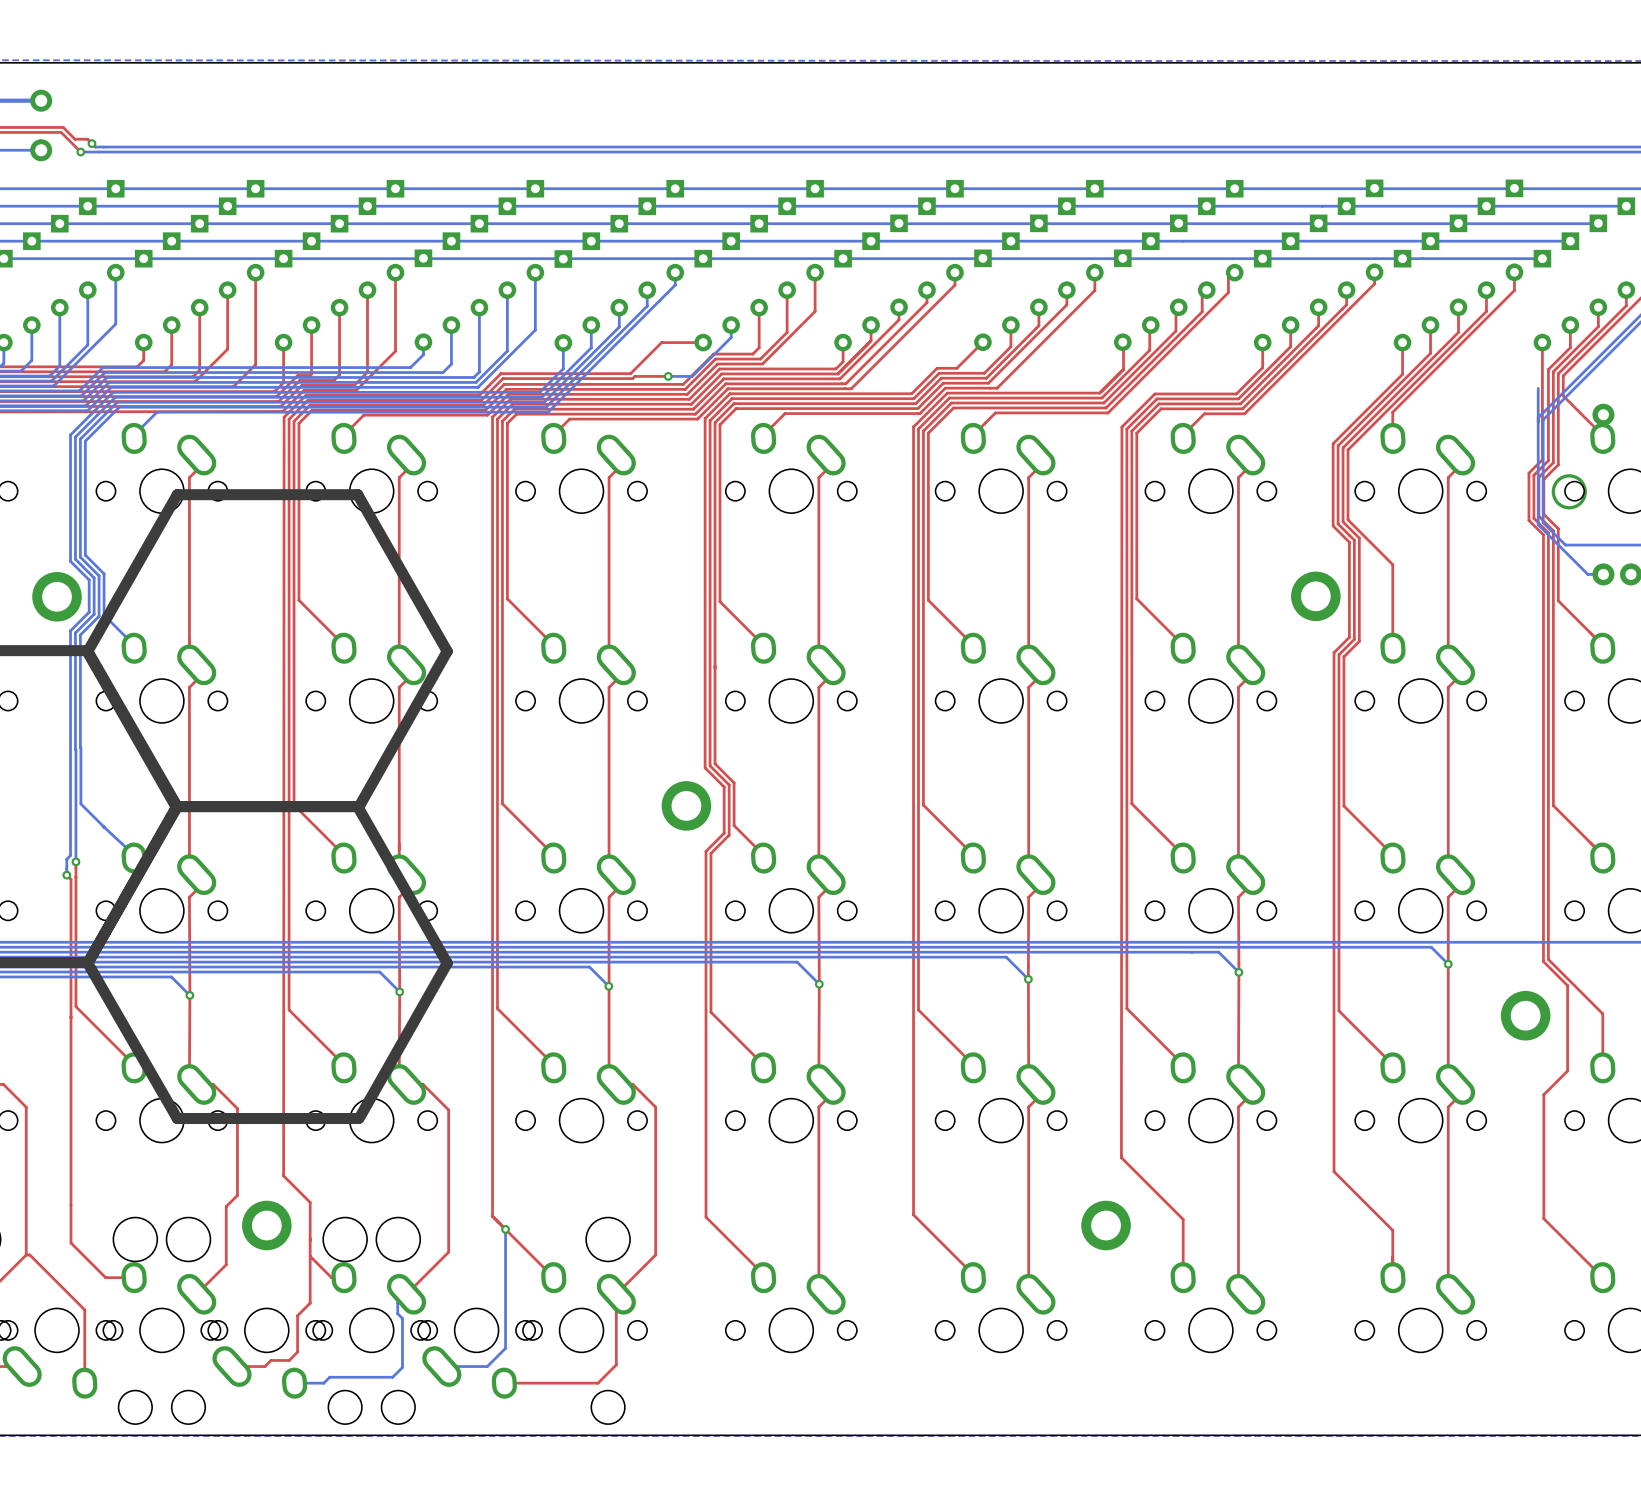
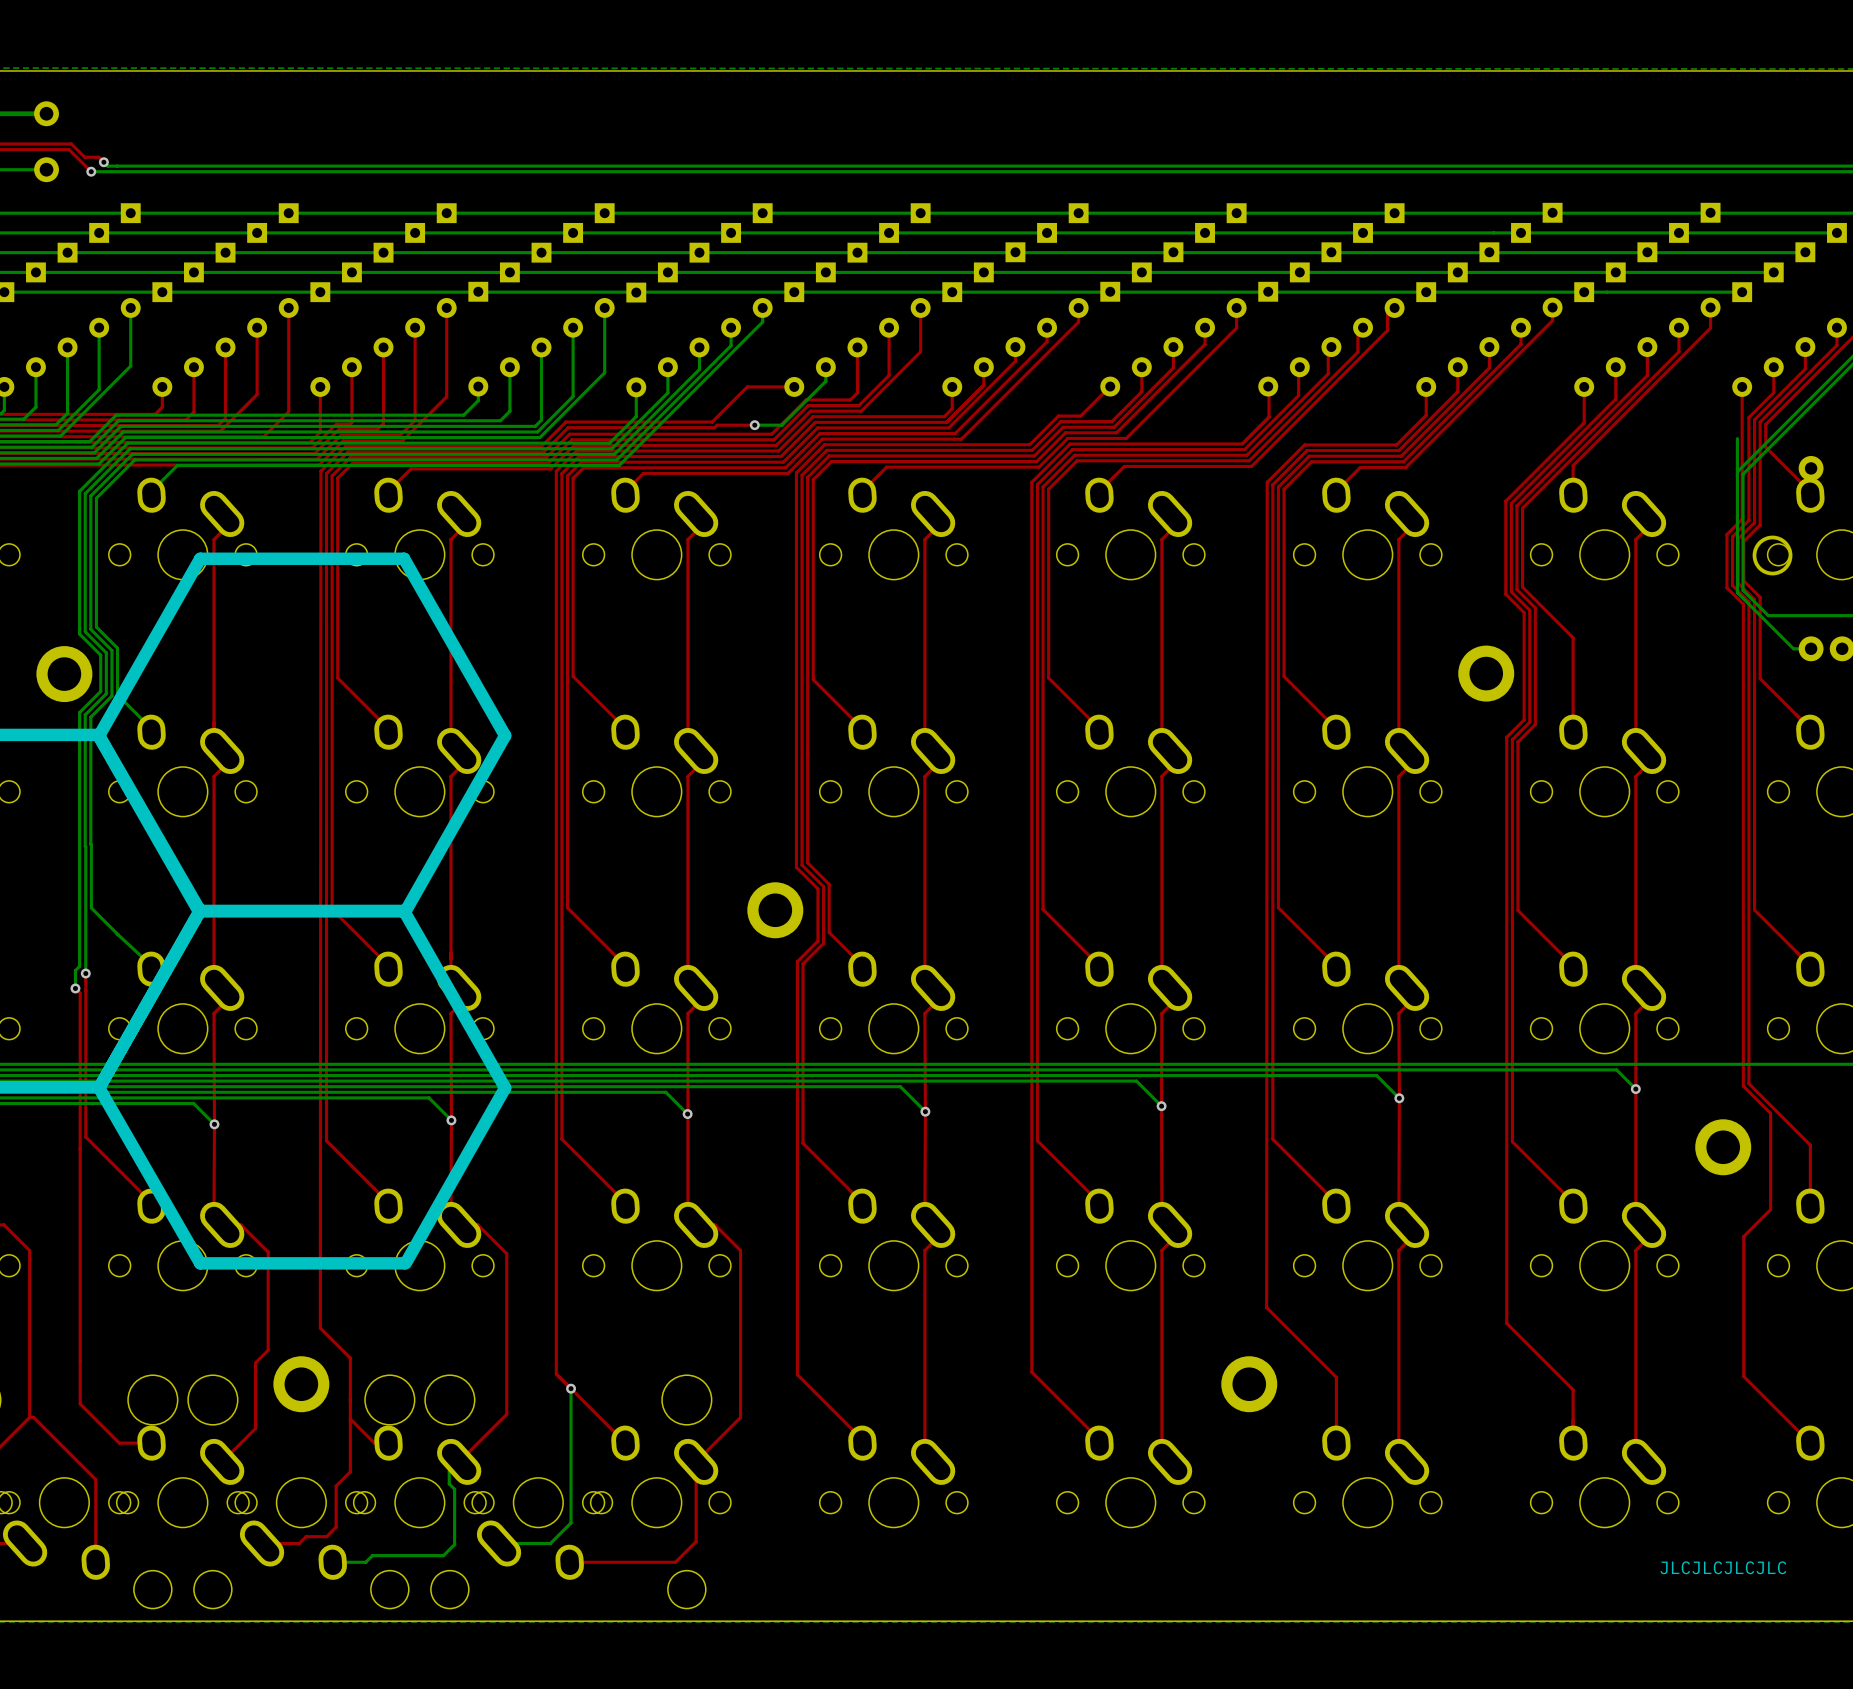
text: none -> JLCJLCJLCJLC (1723, 1567)

